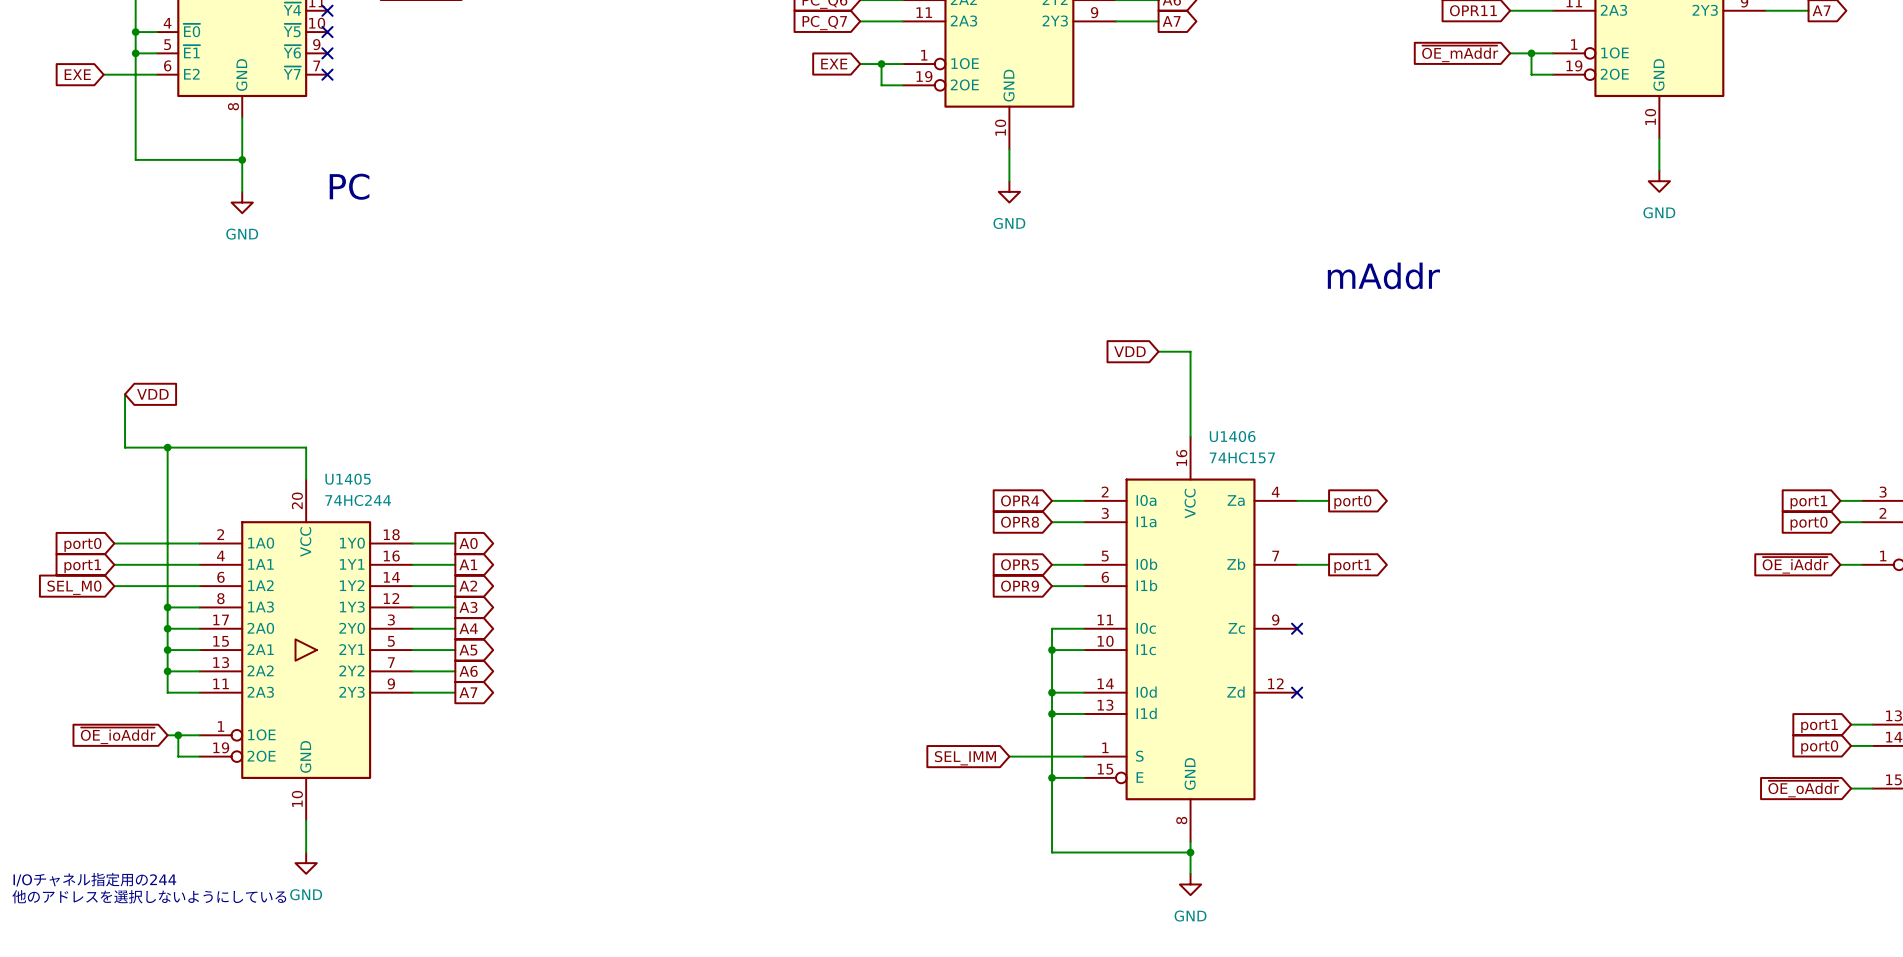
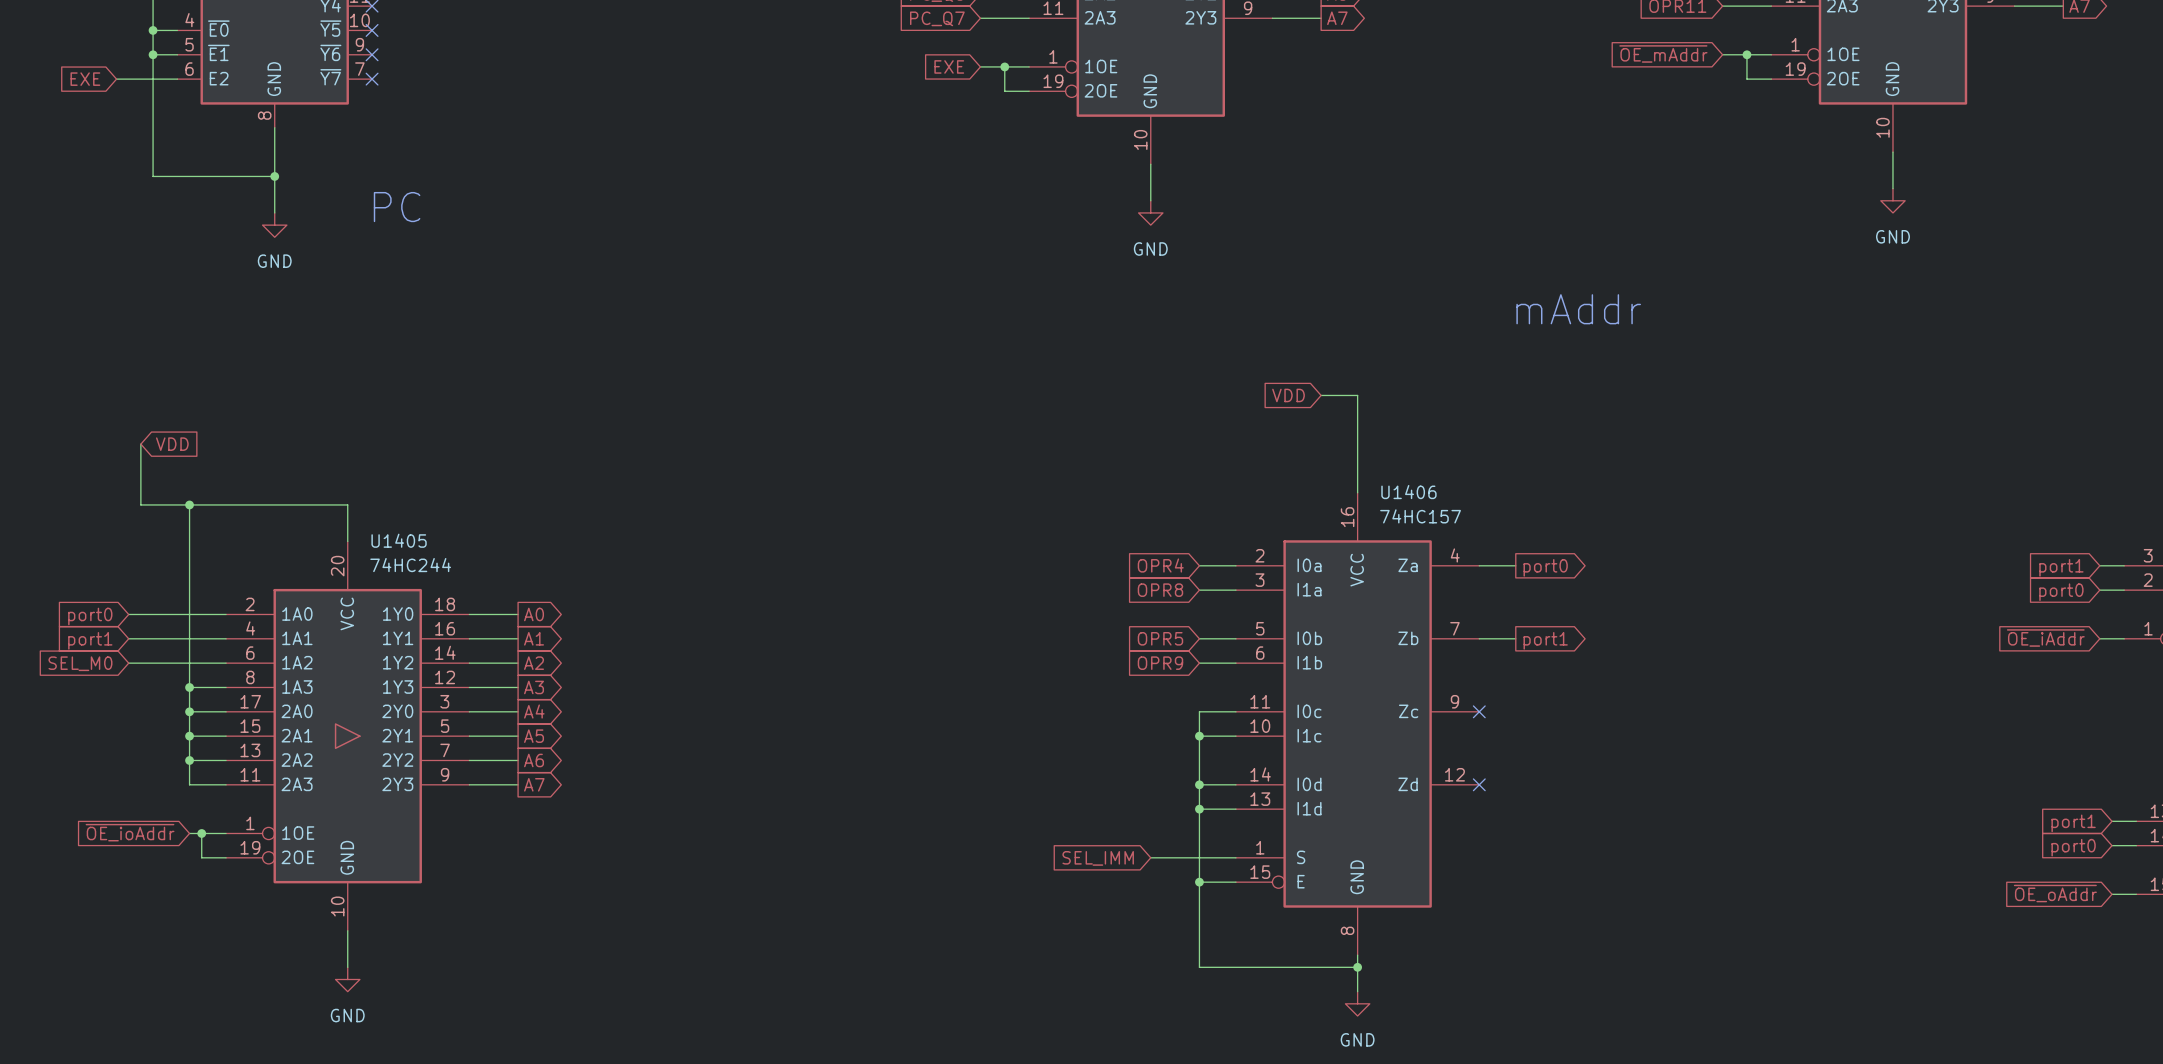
text: I/Oチャネル指定用の244 (94, 879) -> none
text: 他のアドレスを選択しないようにしている (149, 896) -> none

